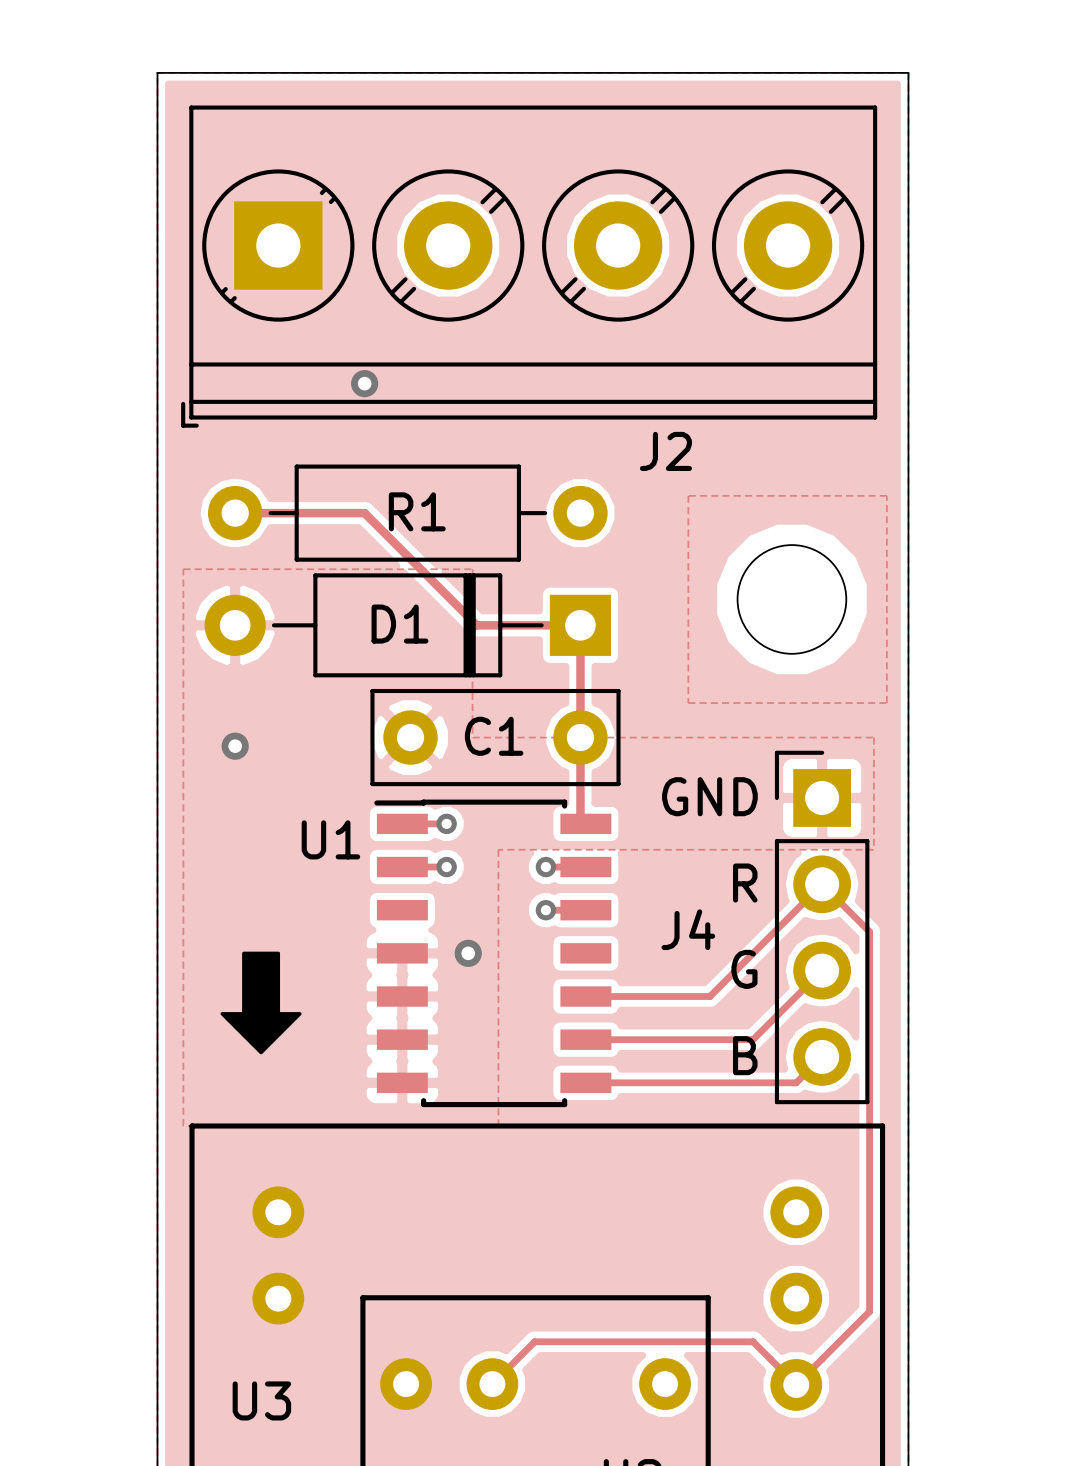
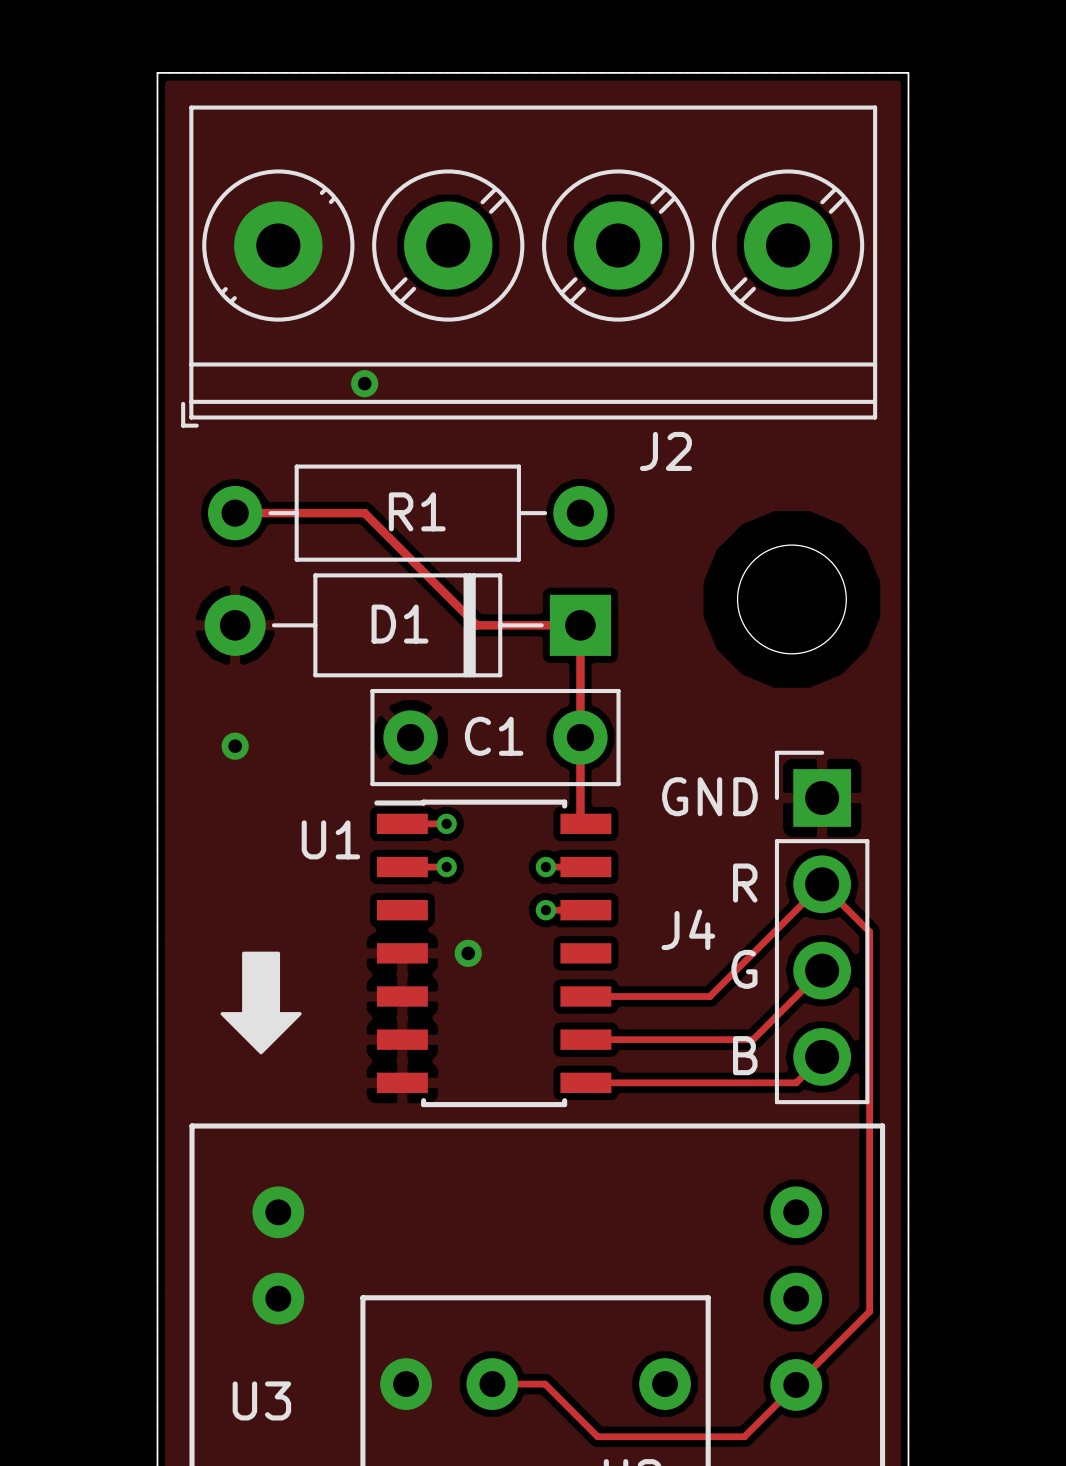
J2 footprint: [181, 105, 878, 428] -> [181, 105, 878, 428]
zone outline: (688, 495) (886, 495) (886, 703) (688, 703) (688, 495) -> none
zone outline: (183, 569) (472, 569) (472, 737) (873, 737) (873, 849) (498, 849) (498, 1125) (183, 1125) (183, 569) -> none
track: (492, 1384) (534, 1341) (753, 1341) (796, 1384) -> (492, 1384) (545, 1384) (597, 1436) (744, 1436) (796, 1384)

